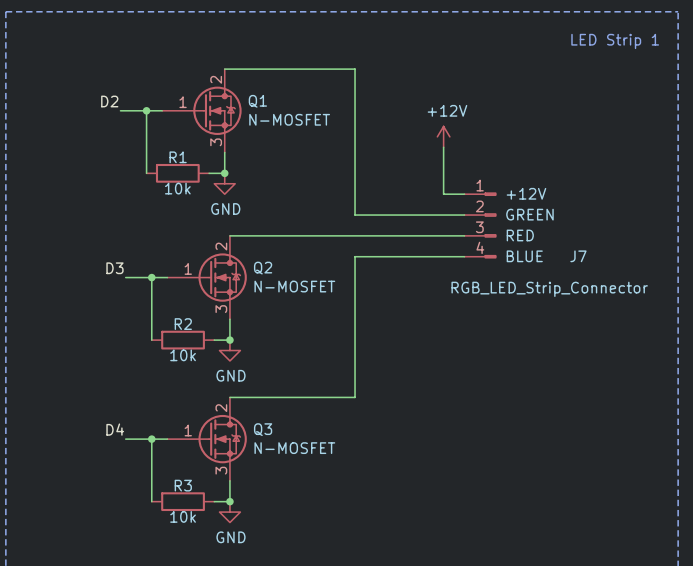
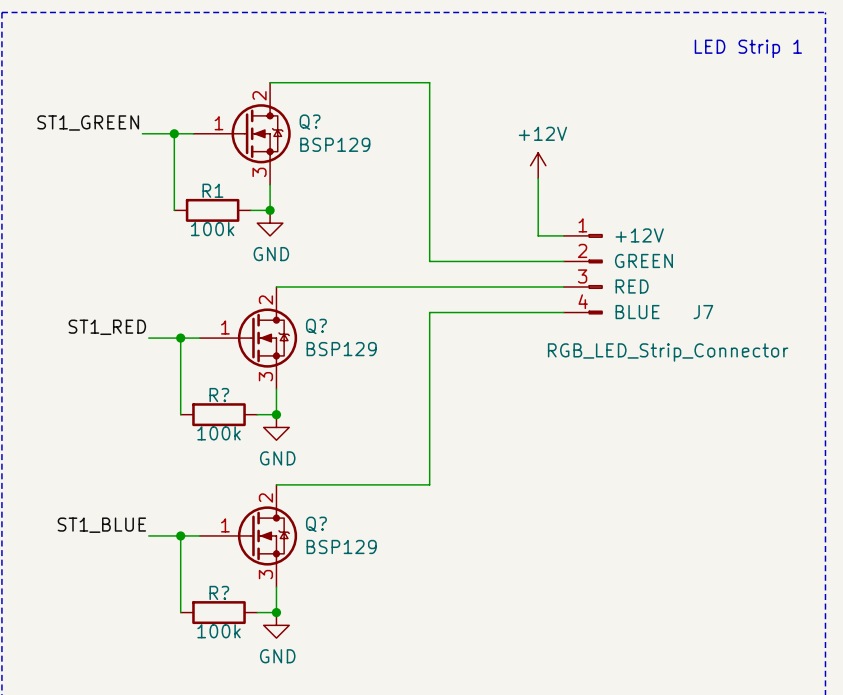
label: D2 (109, 101) -> ST1_GREEN (88, 123)
Q1 name: Q1 (257, 101) -> Q? (310, 122)
Q1 value: N-MOSFET (289, 119) -> BSP129 (335, 144)
R1 value: 10k (177, 188) -> 100k (212, 229)
label: D3 (114, 268) -> ST1_RED (107, 327)
Q2 name: Q2 (263, 268) -> Q? (316, 326)
Q2 value: N-MOSFET (294, 286) -> BSP129 (341, 349)
R2 name: R2 (183, 324) -> R? (219, 395)
R2 value: 10k (183, 355) -> 100k (219, 433)
label: D4 (115, 429) -> ST1_BLUE (101, 525)
Q3 name: Q3 (263, 429) -> Q? (316, 524)
Q3 value: N-MOSFET (294, 448) -> BSP129 (341, 546)
R3 name: R3 (183, 485) -> R? (219, 592)
R3 value: 10k (183, 516) -> 100k (219, 631)

